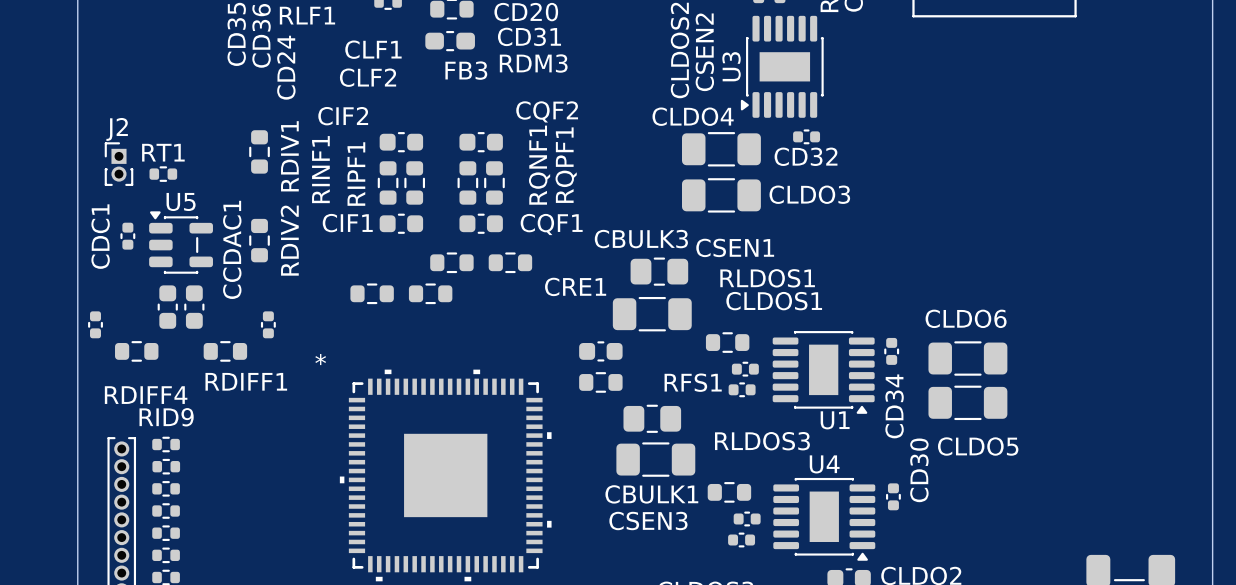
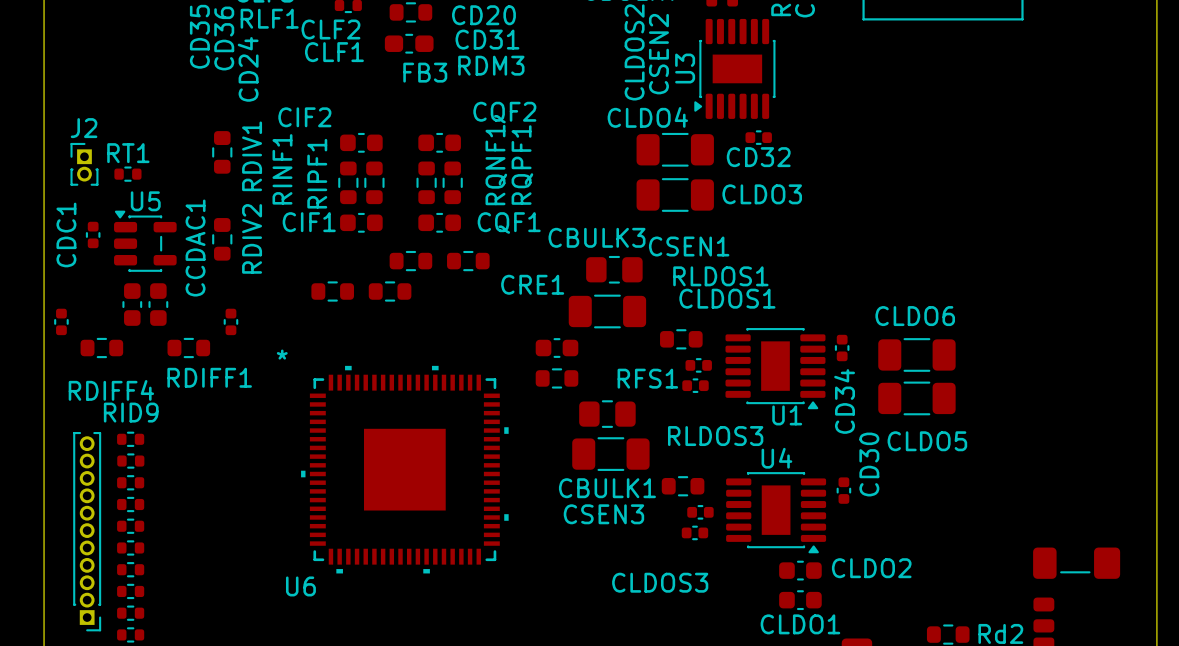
CLF2 name position: CLF2 (368, 77) -> CLF2 (330, 29)

